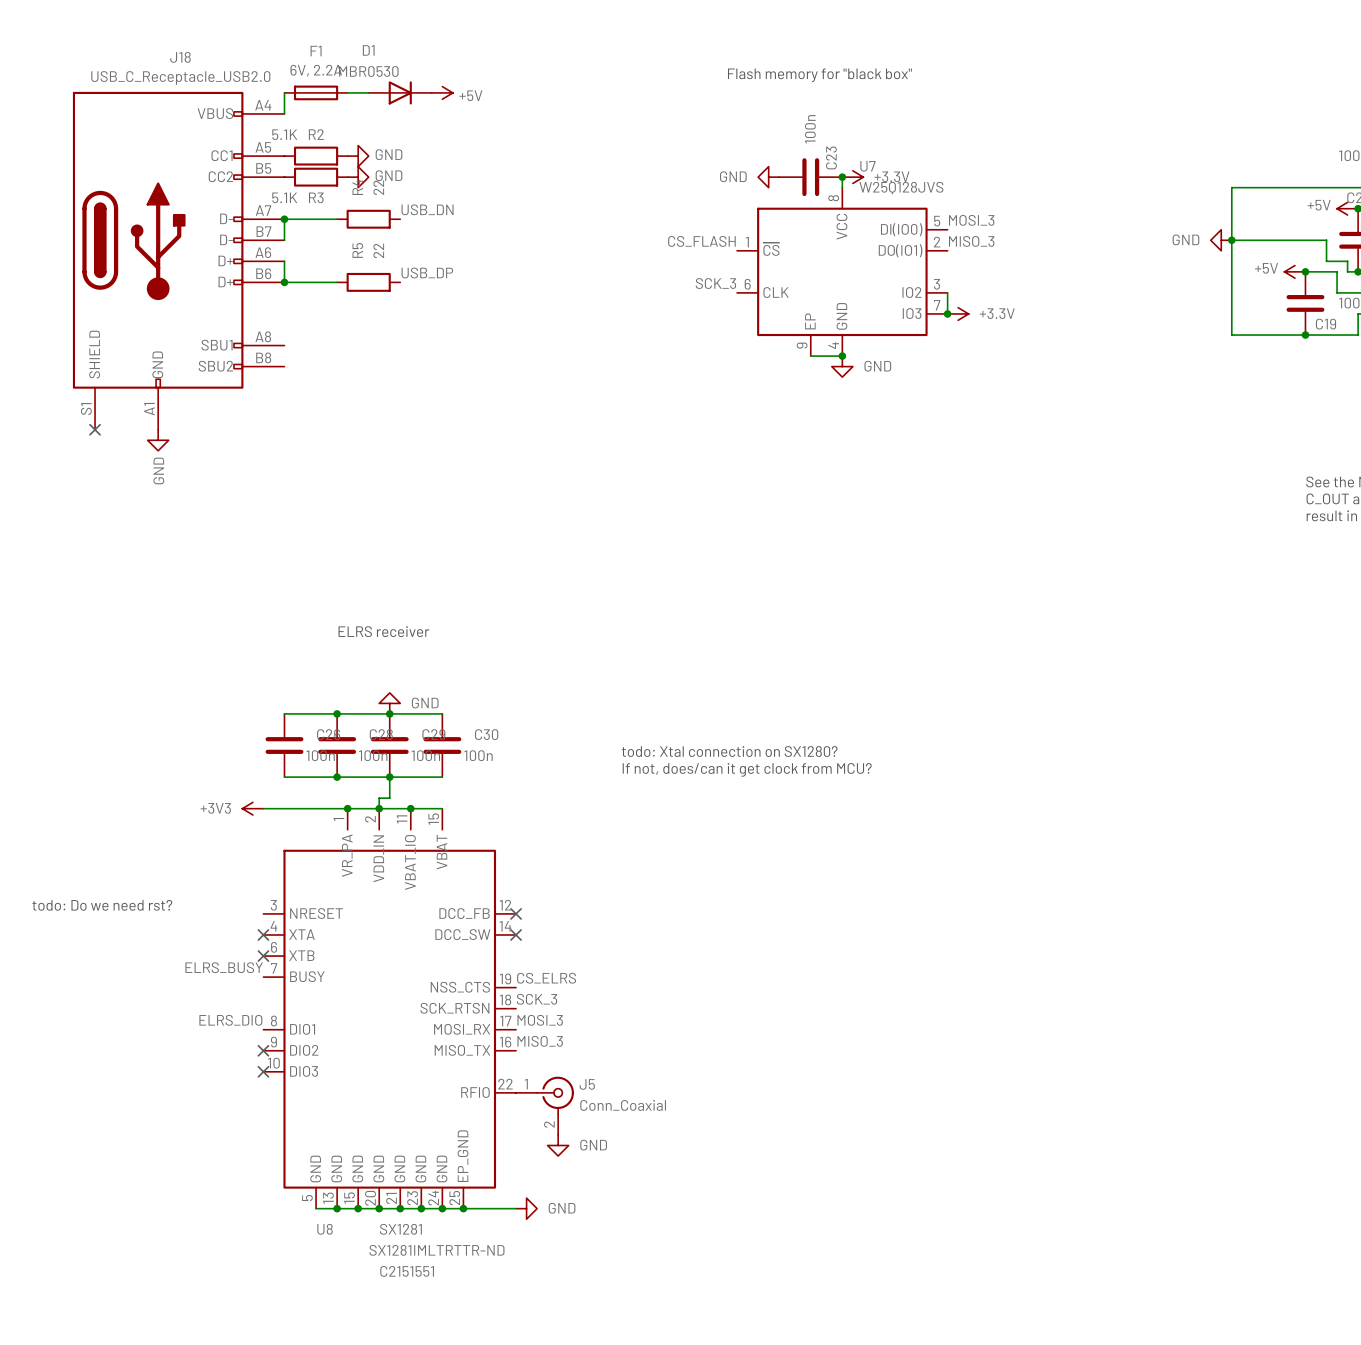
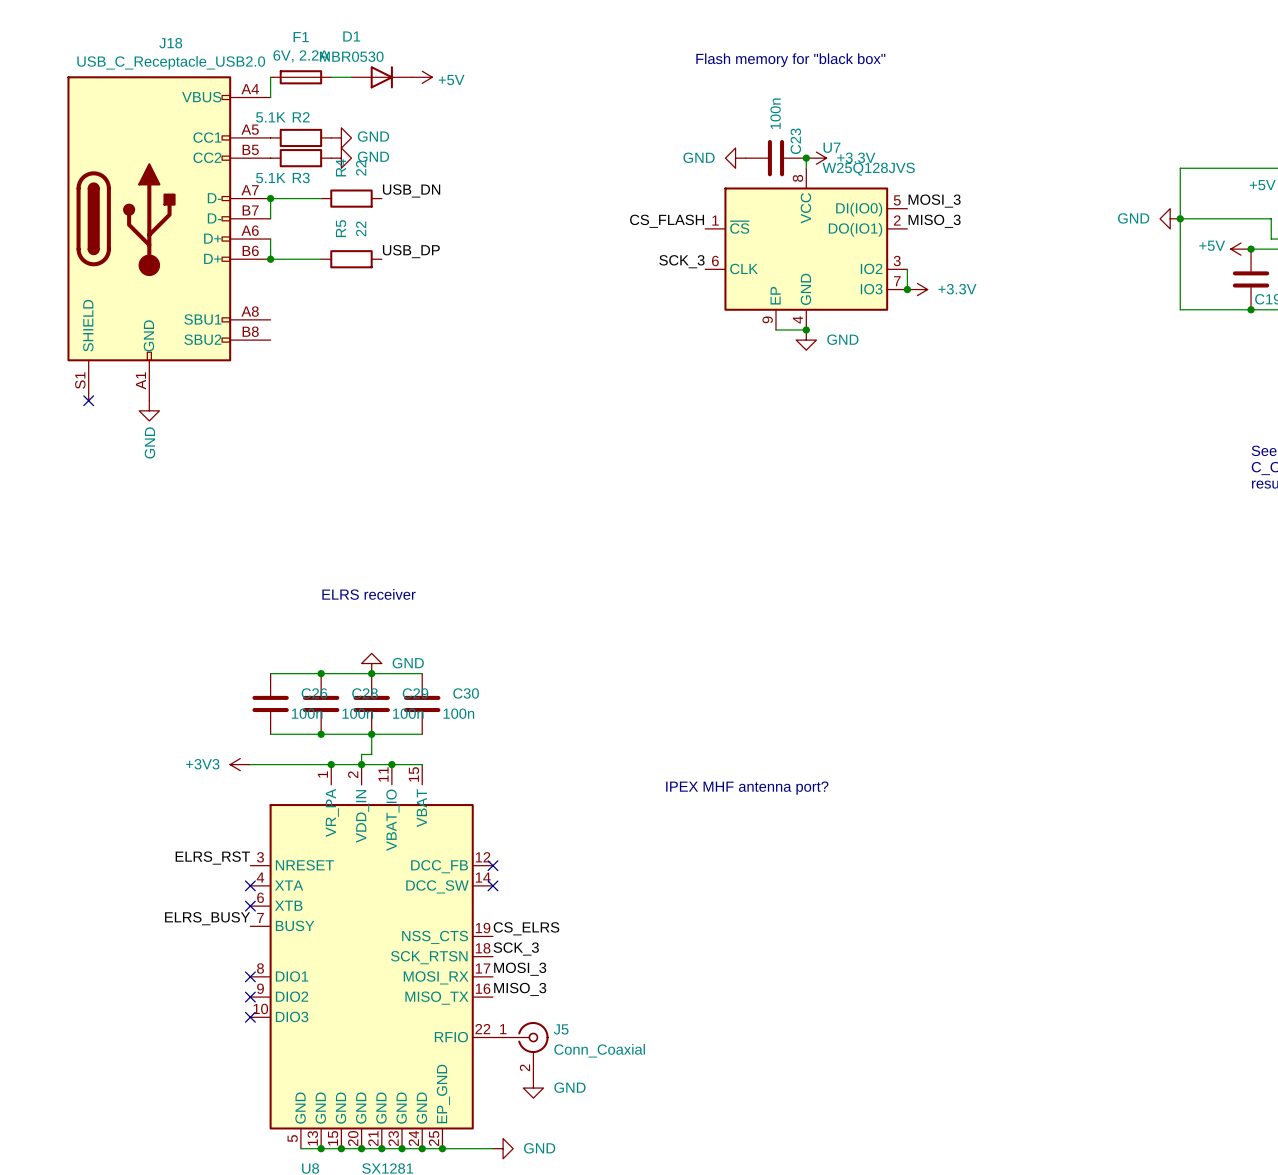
text: todo: Xtal connection on SX1280? (729, 751) -> none
text: If not, does/can it get clock from MCU? (747, 769) -> none
text: none -> IPEX MHF antenna port? (747, 788)
label: none -> ELRS_RST (212, 858)
text: todo: Do we need rst? (102, 905) -> none
label: ELRS_DIO (230, 1020) -> none
no-connect mark: none -> (250, 976)

